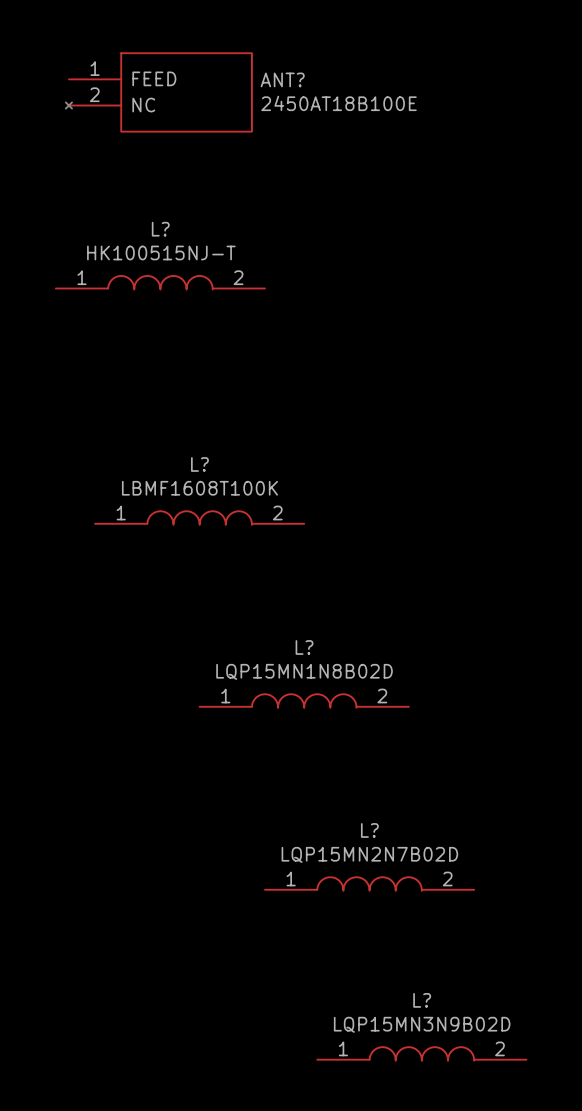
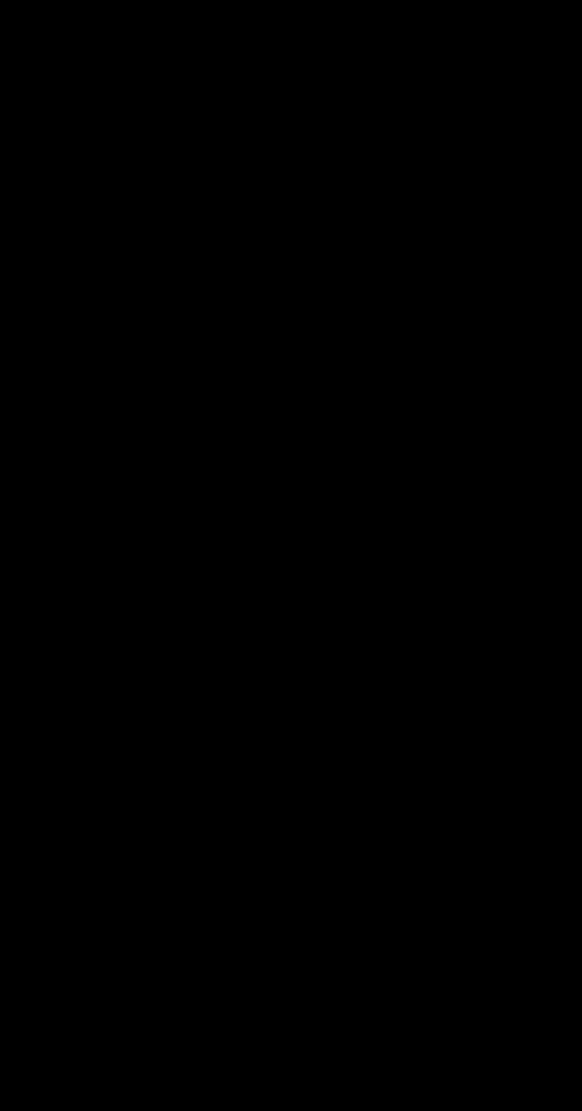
ANT?: 2450AT18B100E (159, 92) -> none
L?: HK100515NJ-T (160, 282) -> none
L?: LBMF1608T100K (199, 518) -> none
L?: LQP15MN1N8B02D (304, 701) -> none
L?: LQP15MN2N7B02D (369, 884) -> none
L?: LQP15MN3N9B02D (421, 1053) -> none

